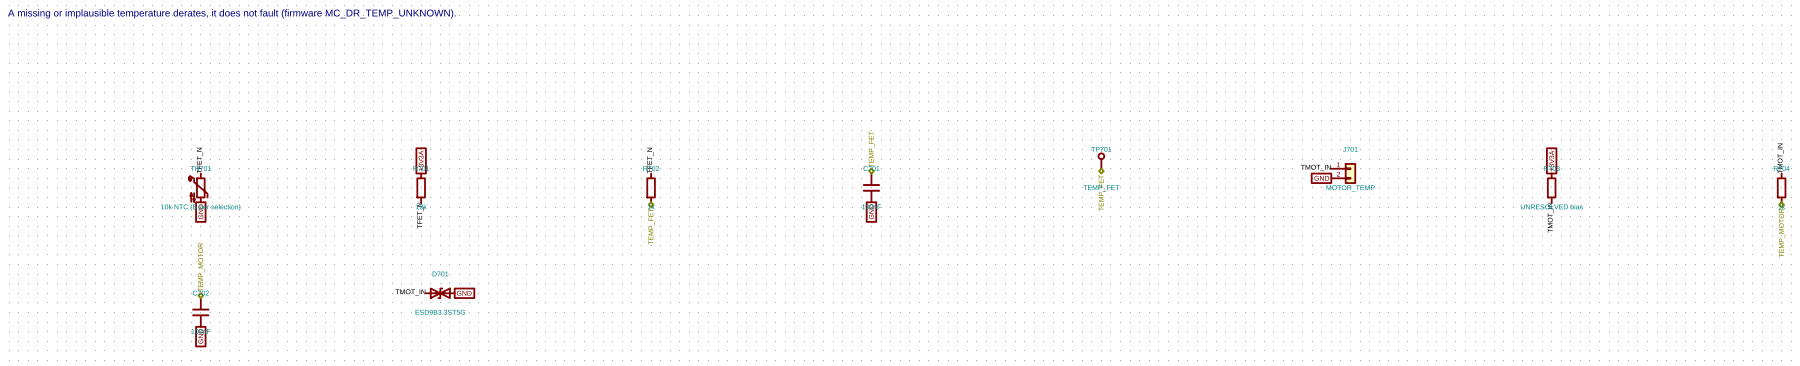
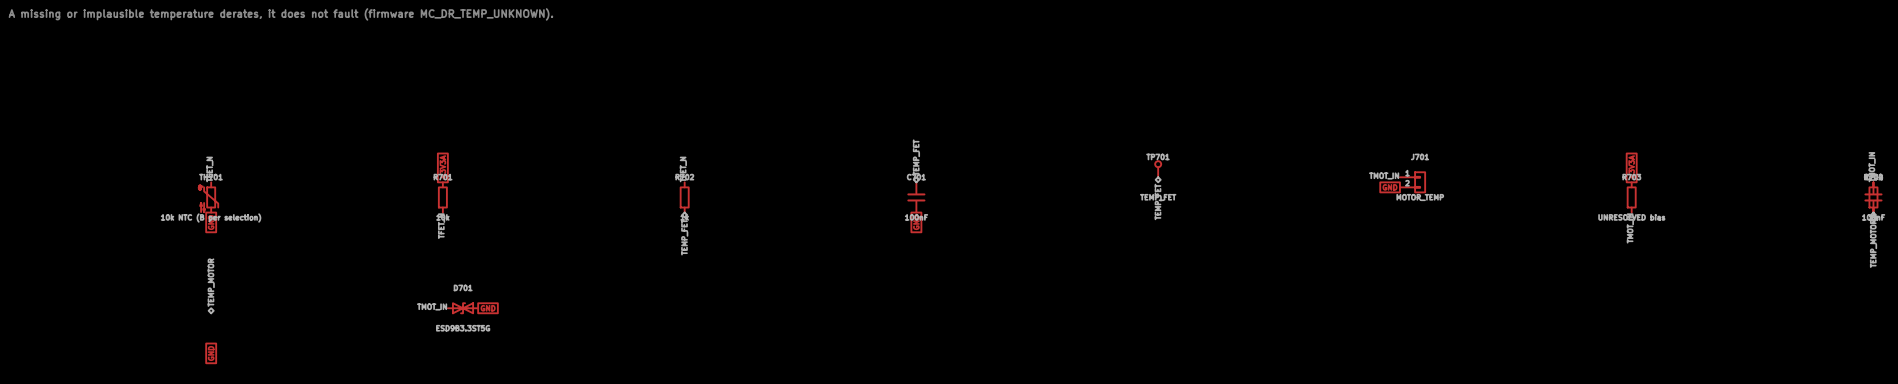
part position: (200, 312) -> (1873, 197)

